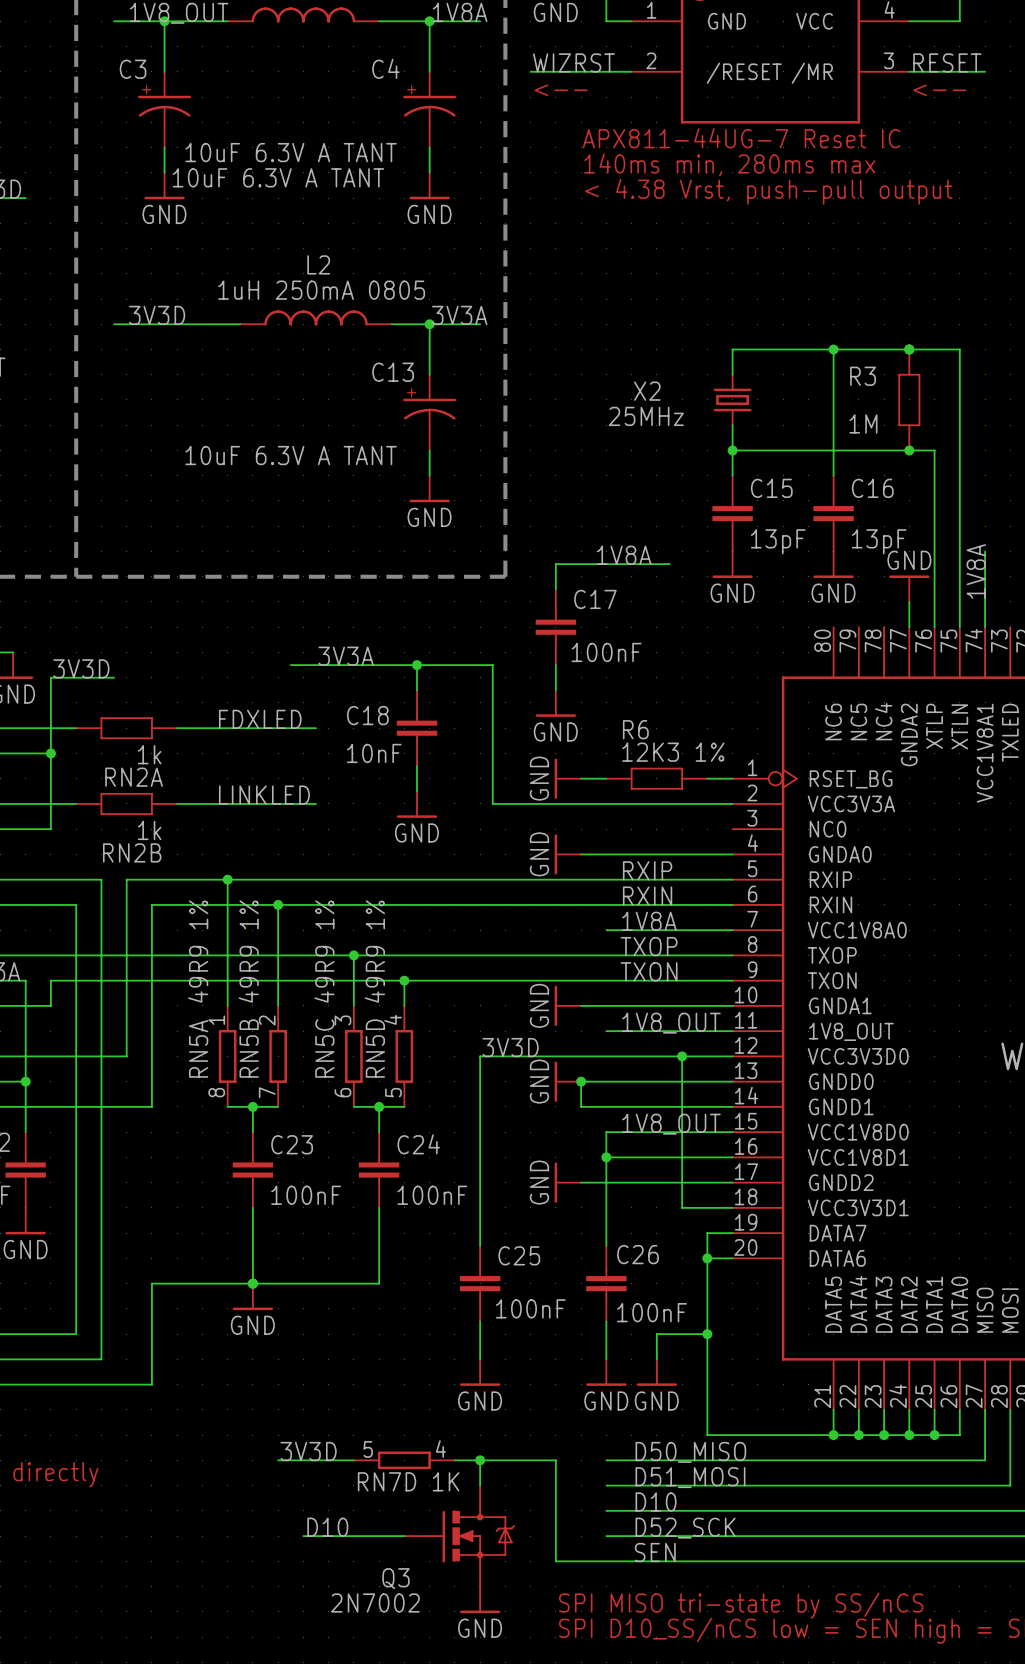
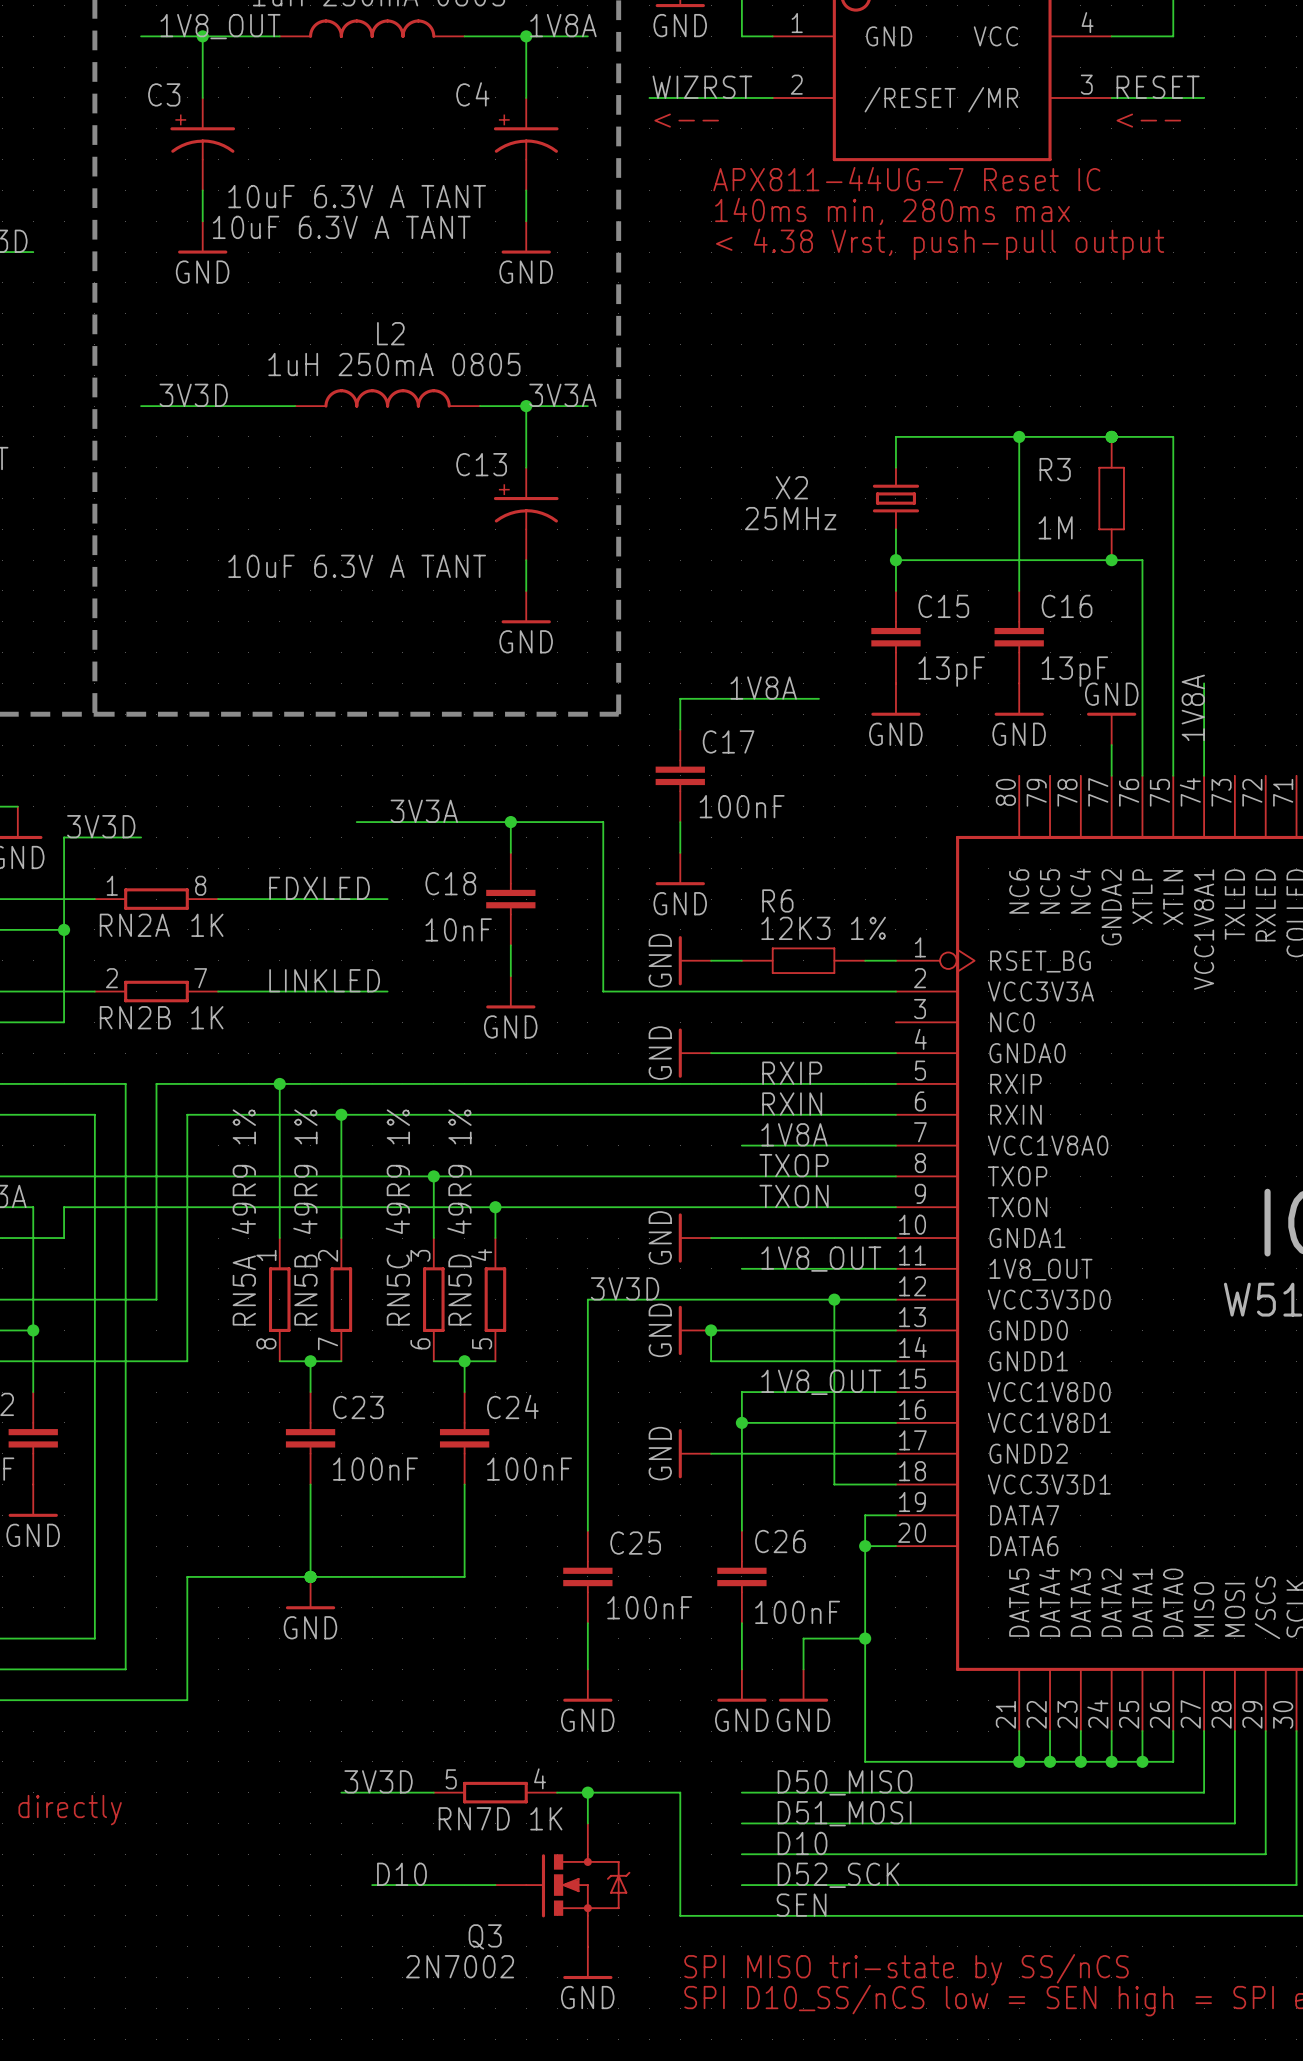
RN2A symbol: [76, 717, 178, 740] -> [94, 888, 219, 910]
RN2A value: 1k (149, 754) -> 1K (207, 925)
RN2A name position: RN2A (134, 777) -> RN2A (134, 925)
RN2B symbol: [76, 793, 178, 815] -> [94, 980, 219, 1003]
RN2B value: 1k (149, 830) -> 1K (207, 1017)
RN2B name position: RN2B (132, 852) -> RN2B (135, 1017)

